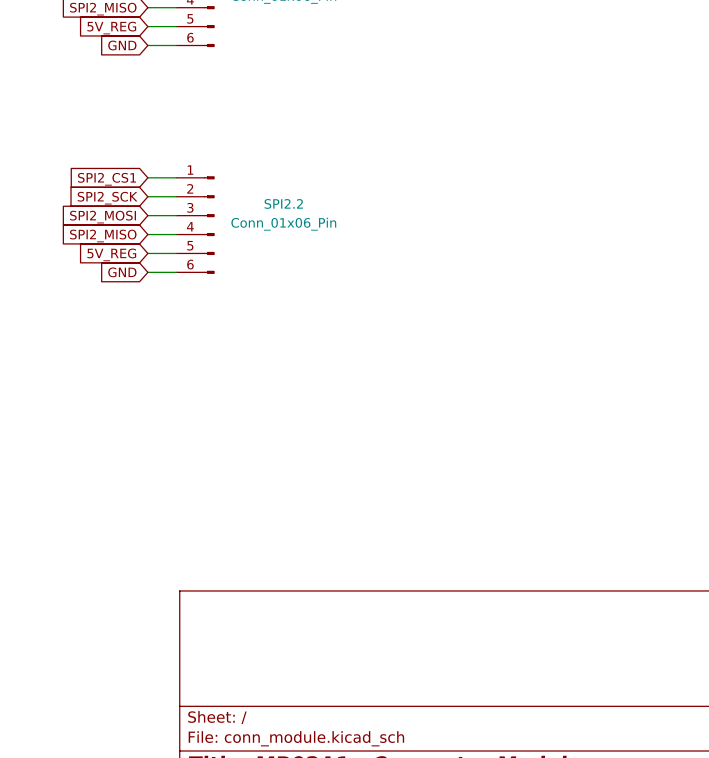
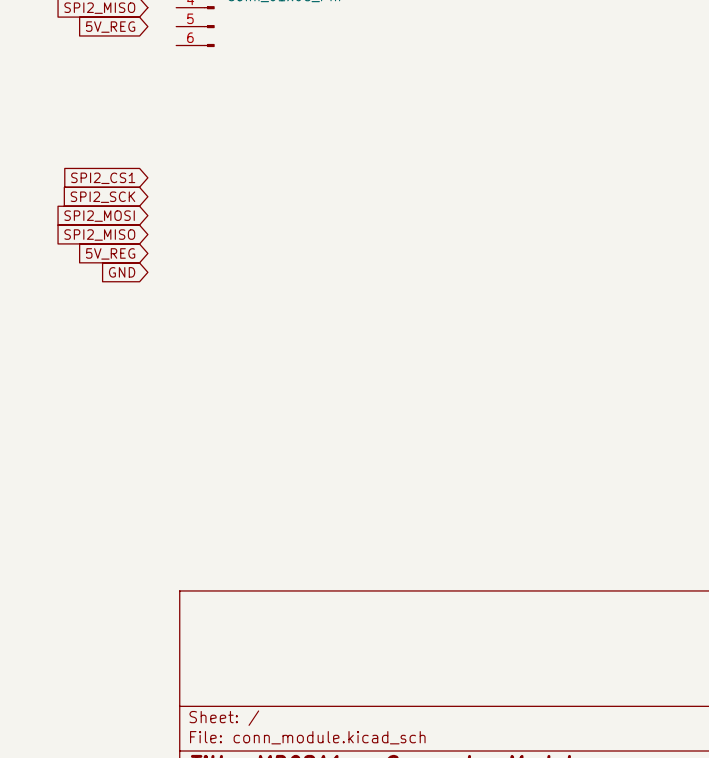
wire: (147, 7) (176, 7) -> none
wire: (147, 26) (176, 26) -> none
global label: GND (122, 45) -> none
wire: (147, 45) (176, 45) -> none
wire: (147, 177) (176, 177) -> none
wire: (147, 196) (176, 196) -> none
wire: (147, 215) (176, 215) -> none
SPI2.2: Conn_01x06_Pin (195, 225) -> none
wire: (147, 234) (176, 234) -> none
wire: (147, 253) (176, 253) -> none
wire: (147, 272) (176, 272) -> none

